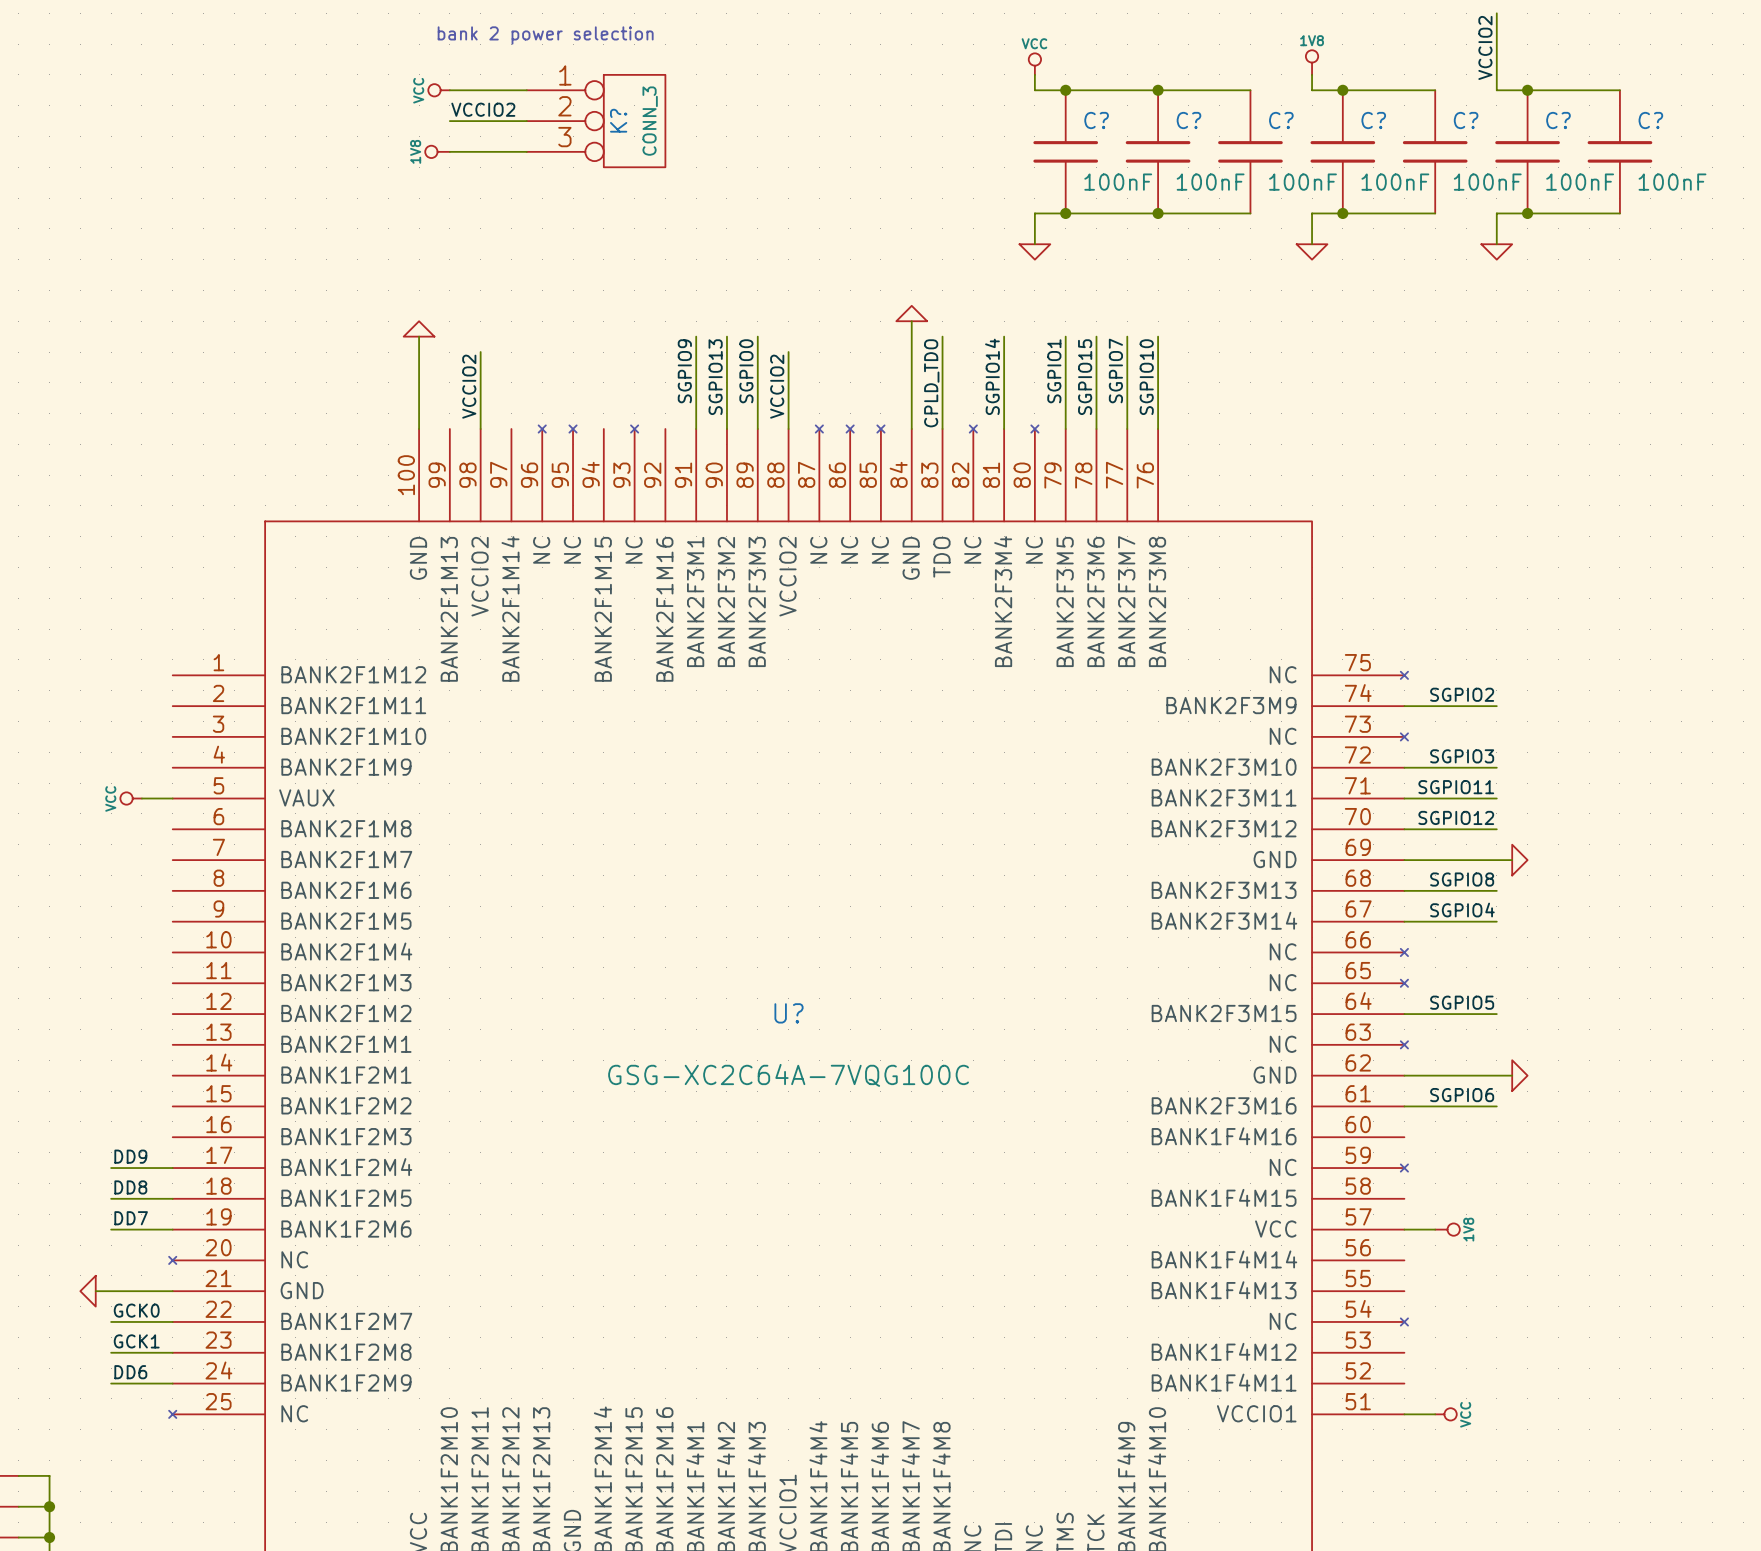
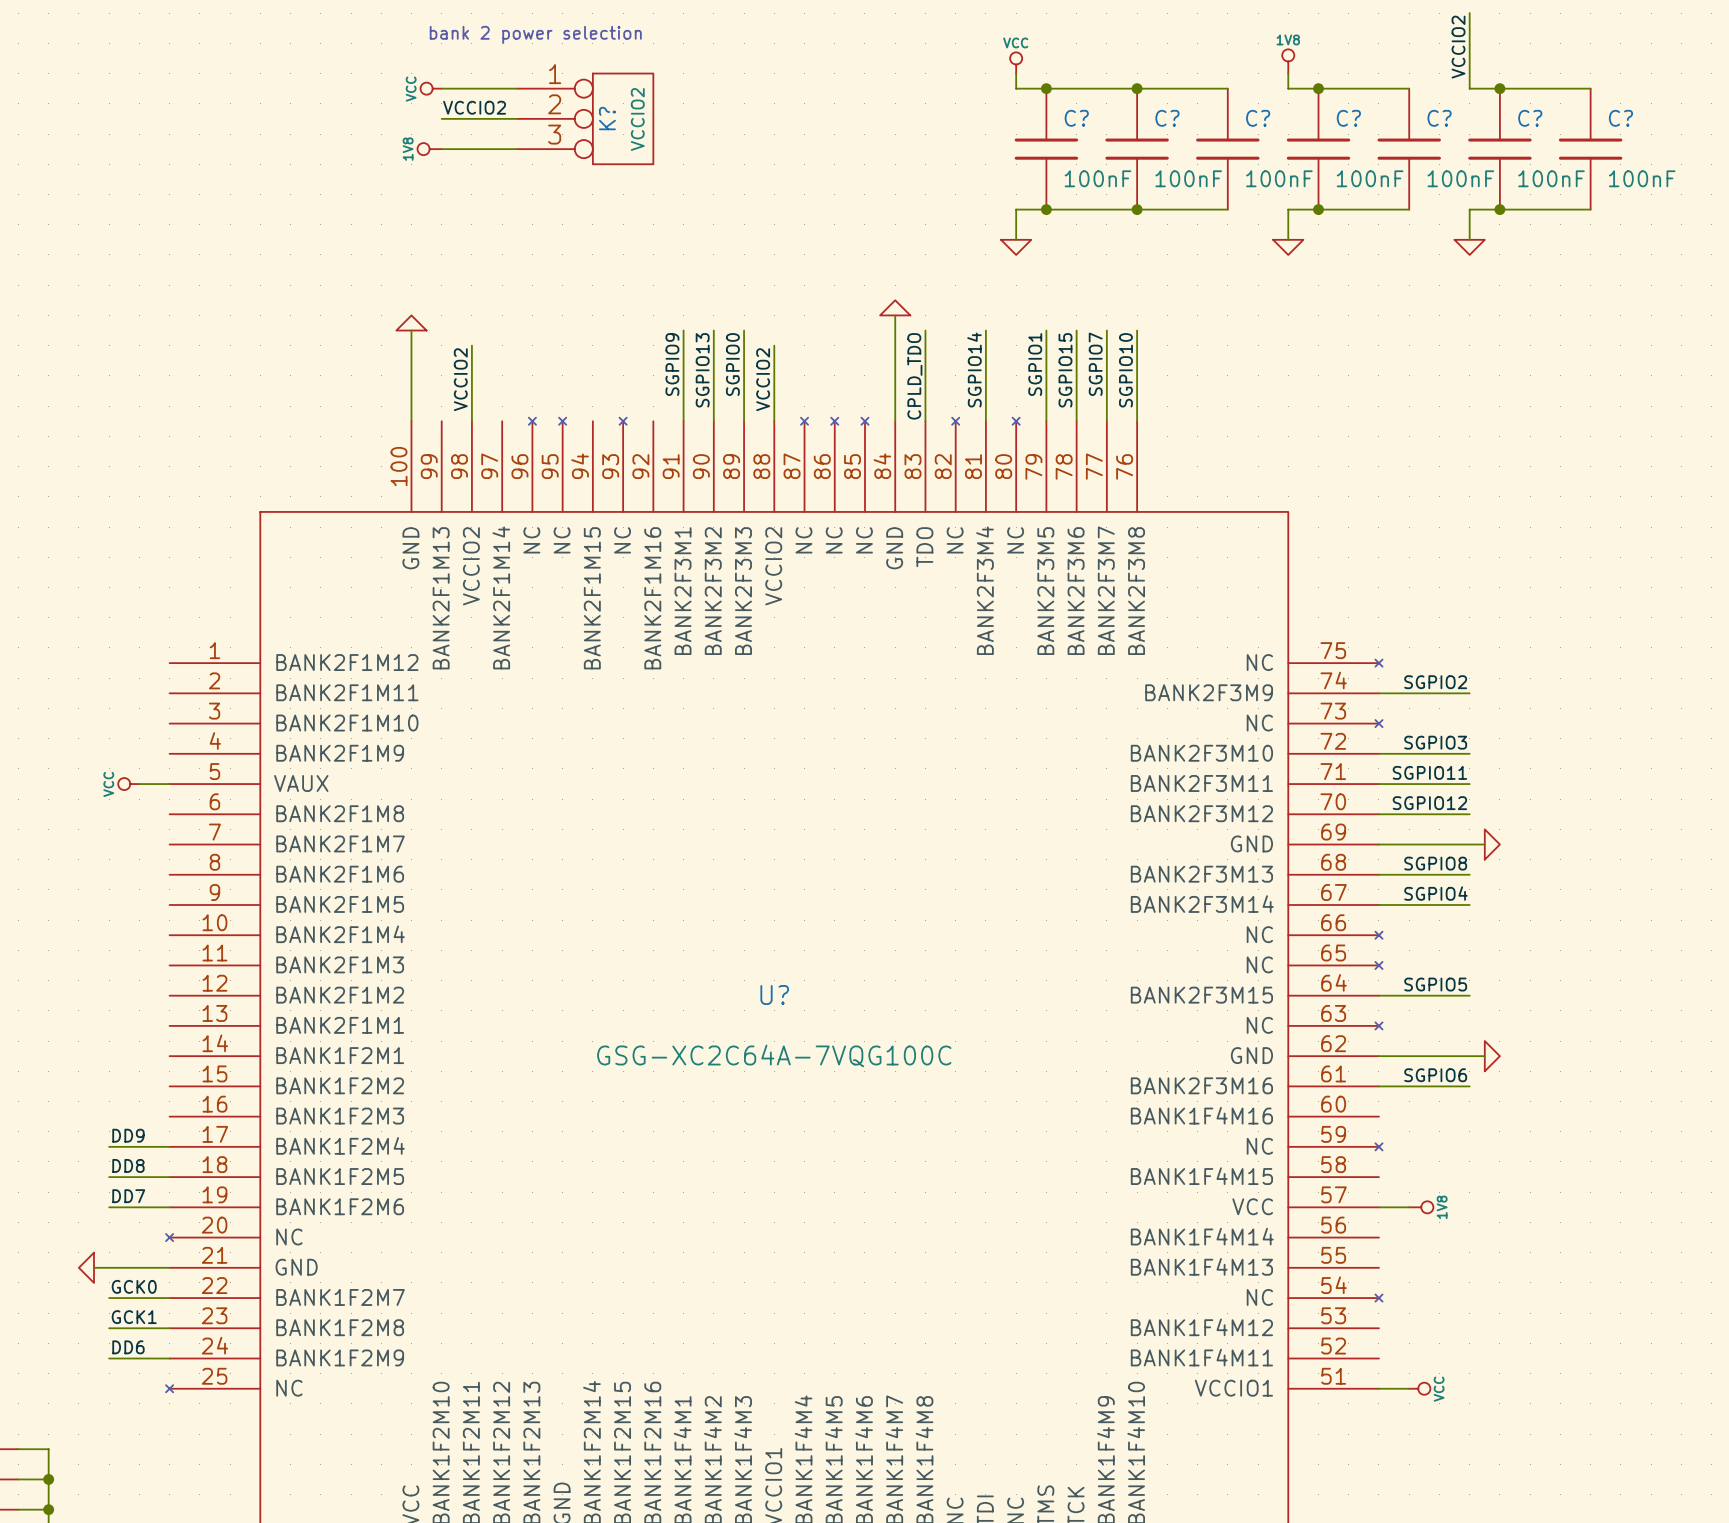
K? value: CONN_3 (650, 121) -> VCCIO2 (637, 119)

